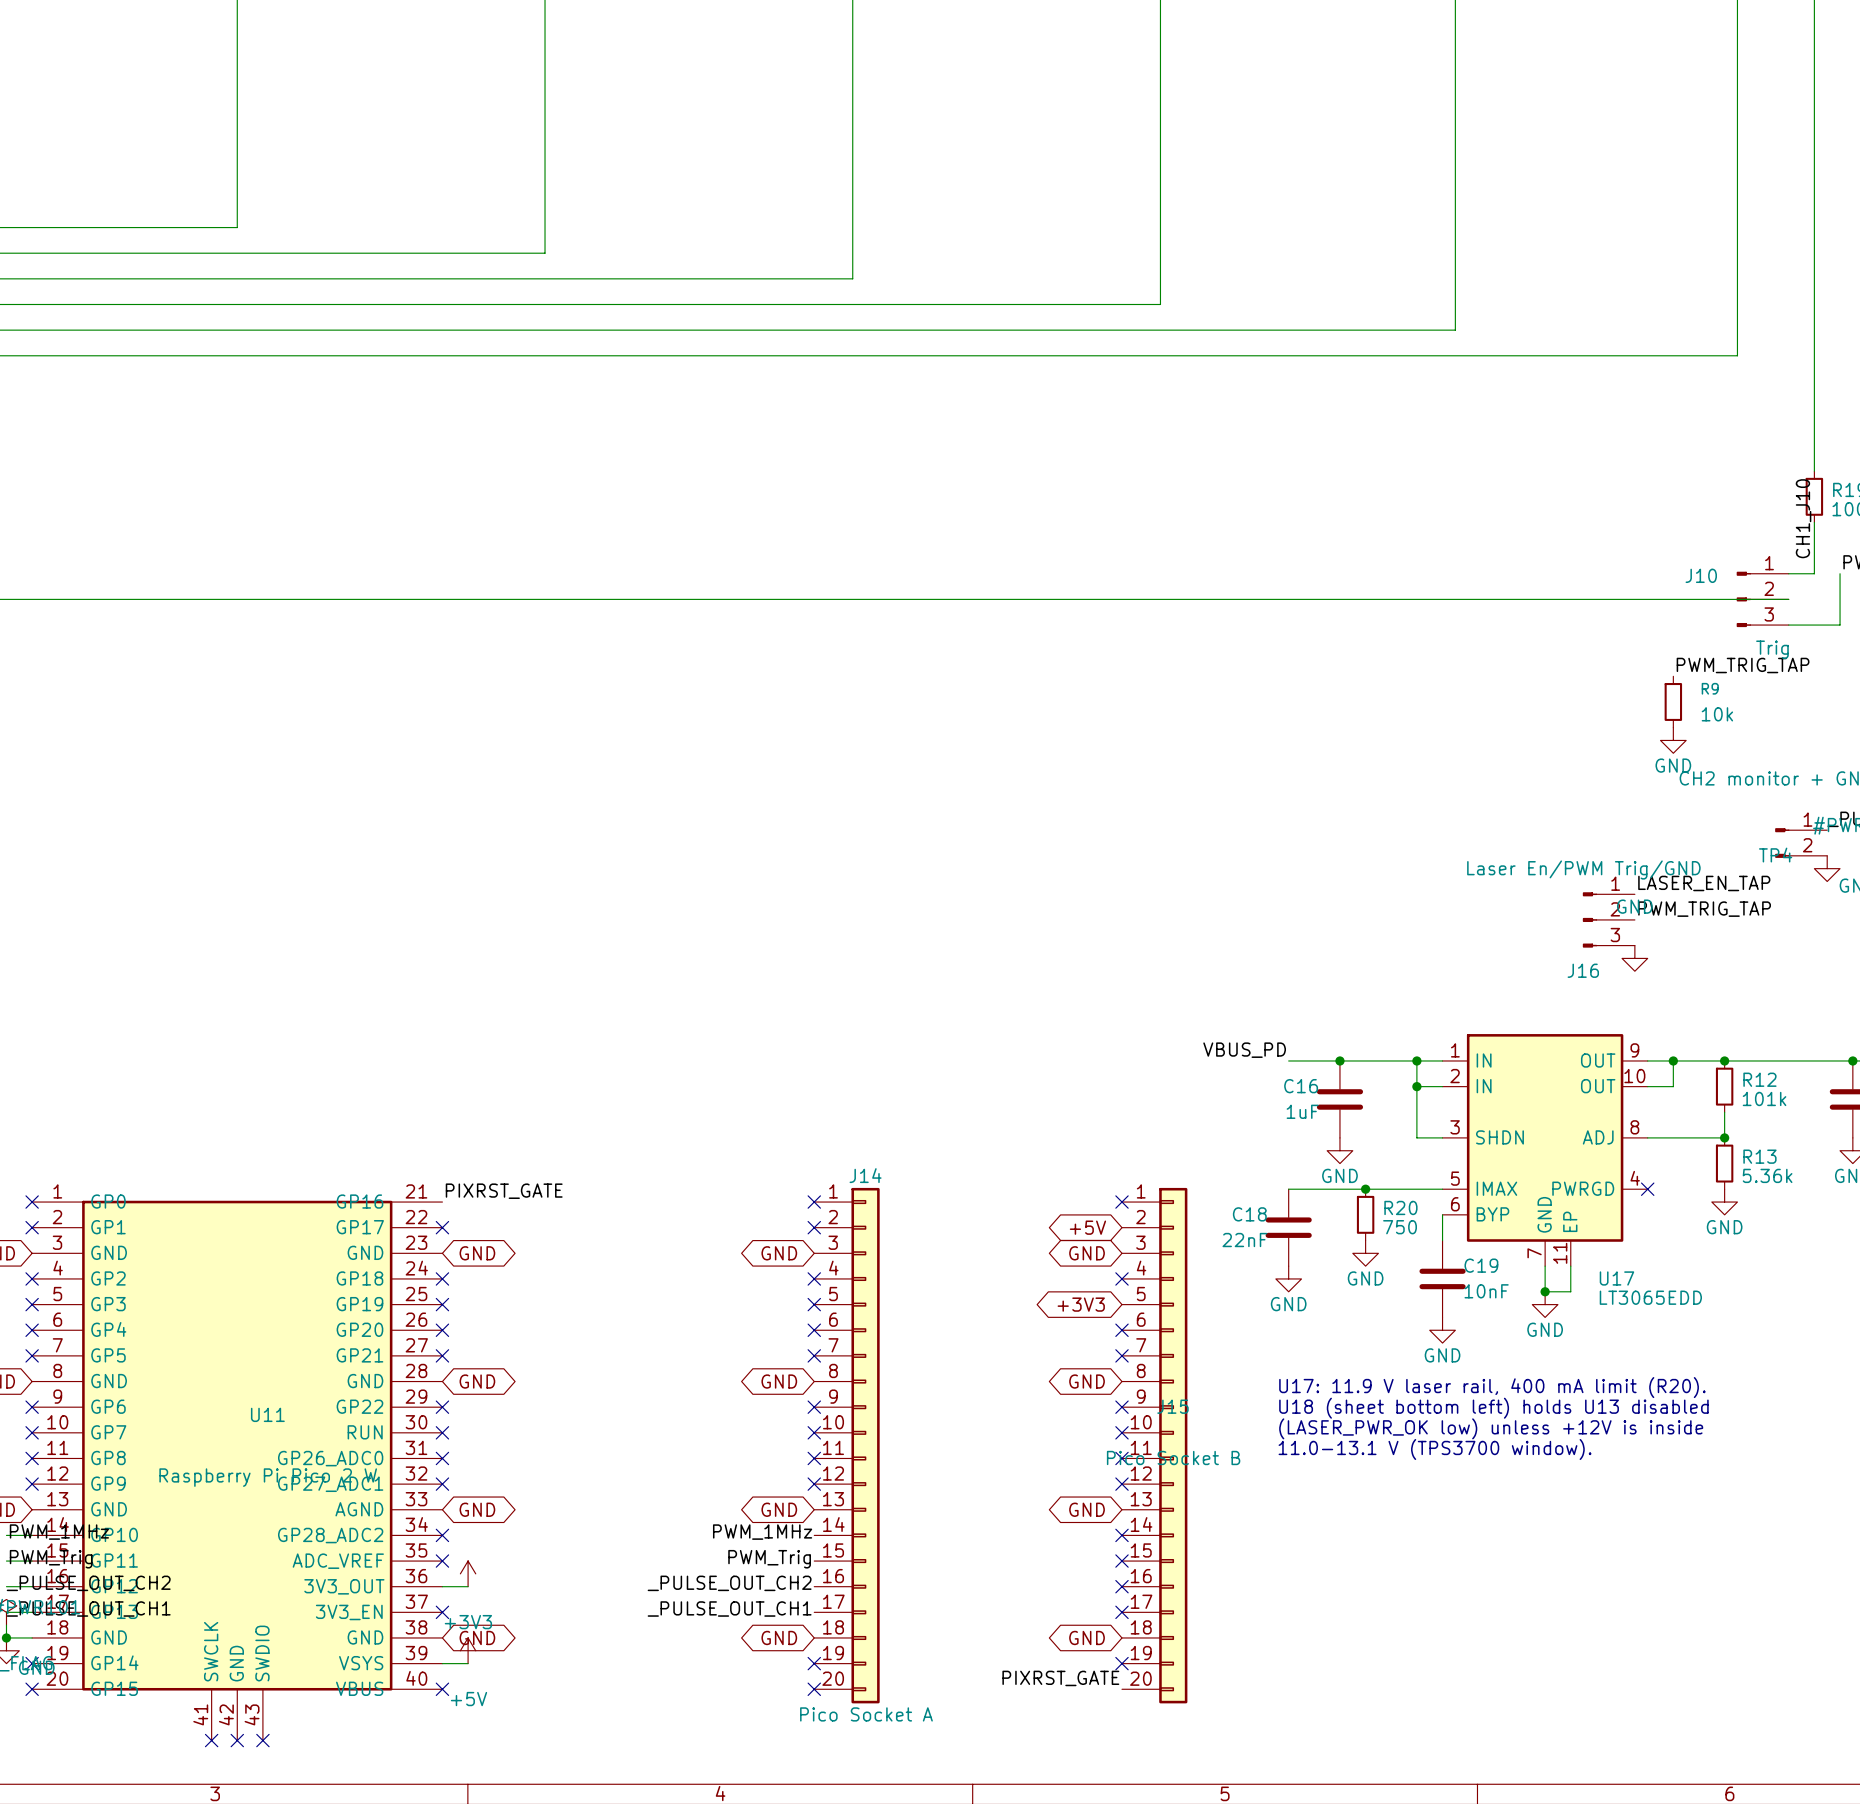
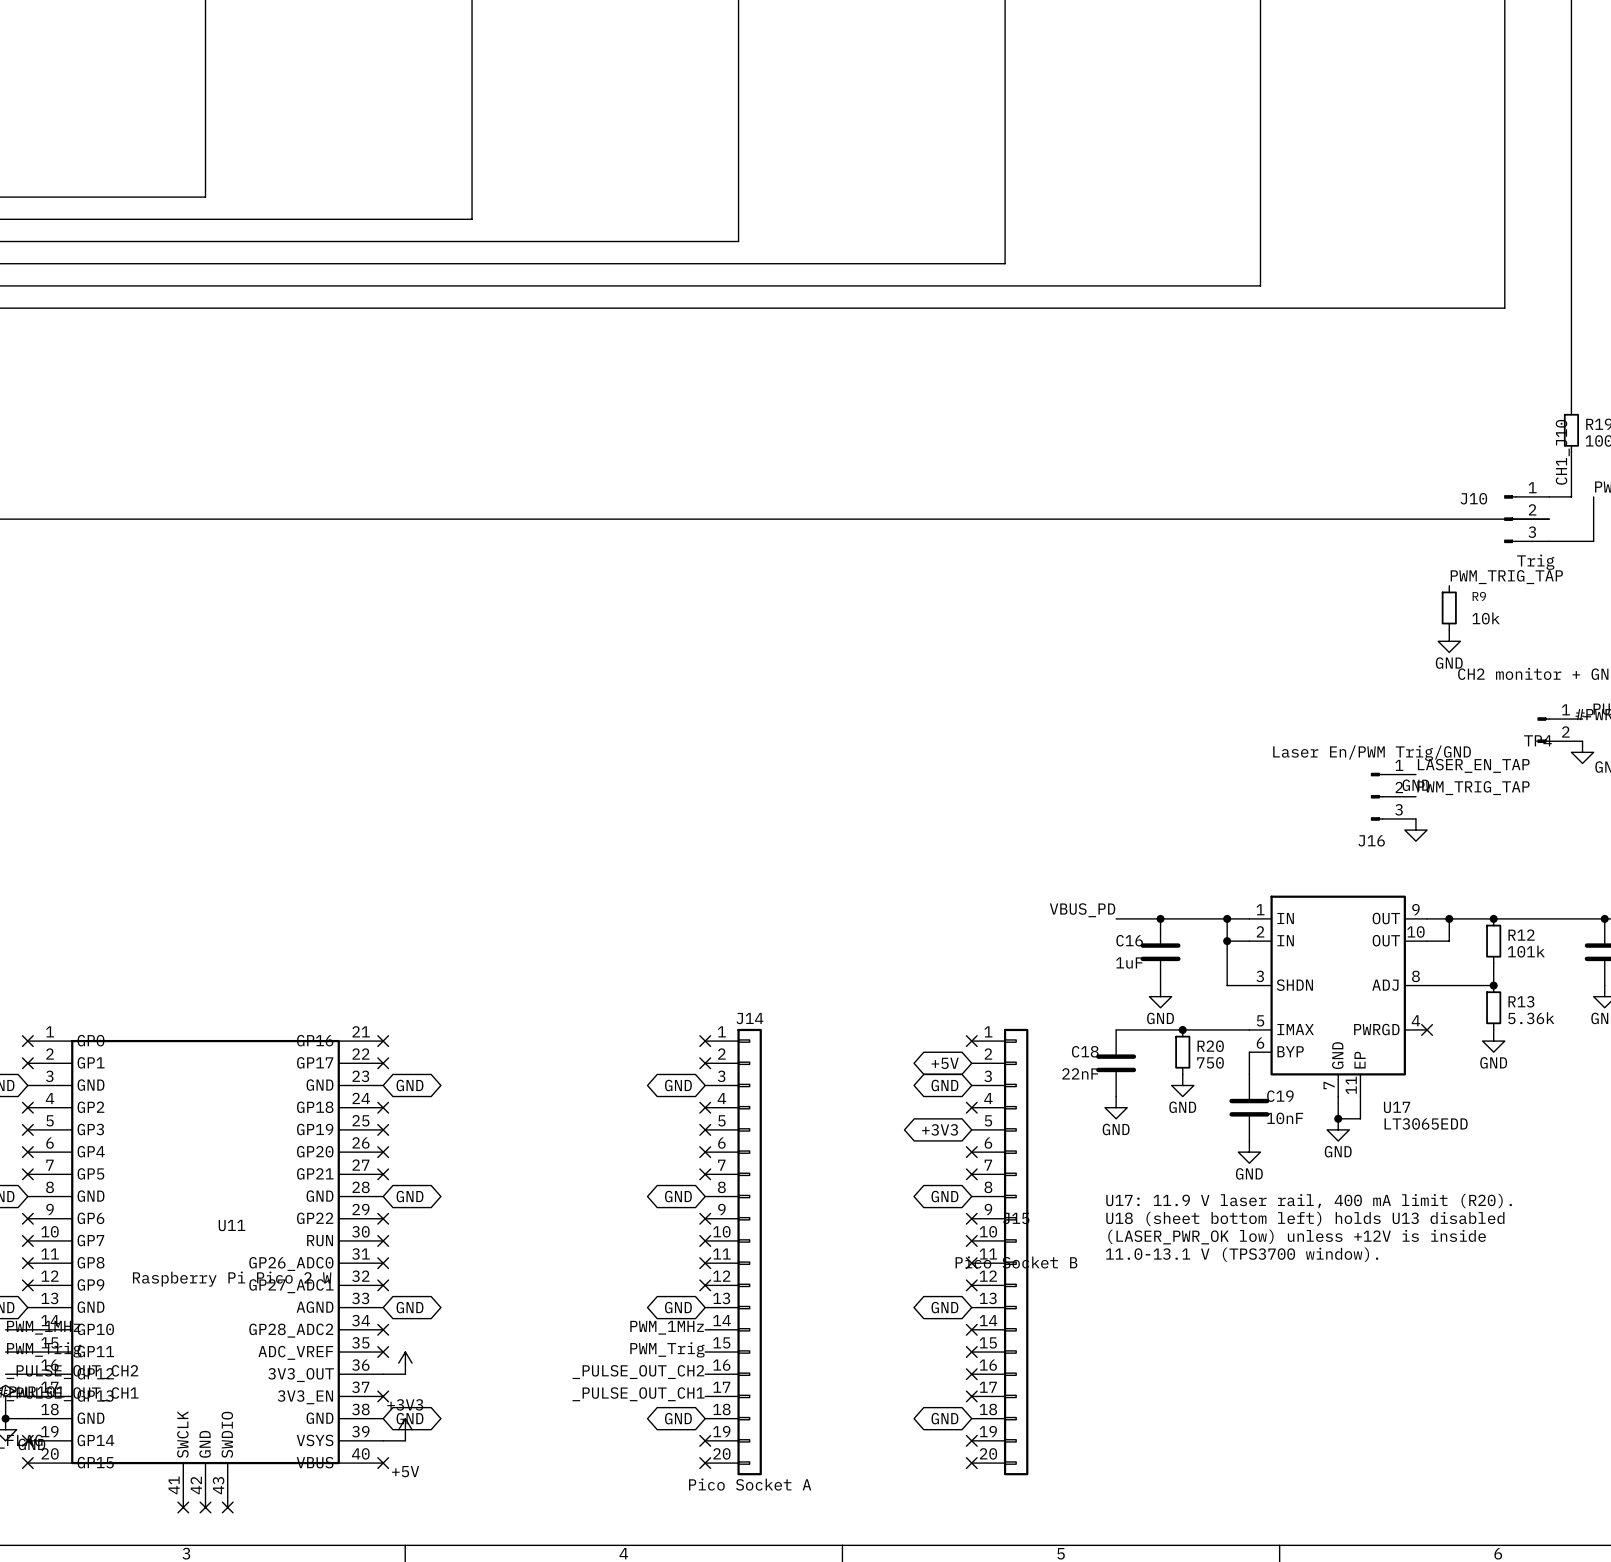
label: PIXRST_GATE (504, 1191) -> none
no-connect mark: none -> (383, 1041)
label: PIXRST_GATE (1060, 1678) -> none
no-connect mark: none -> (971, 1463)

